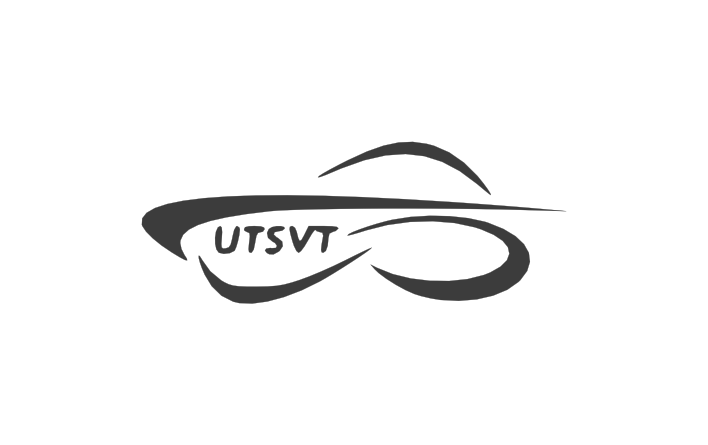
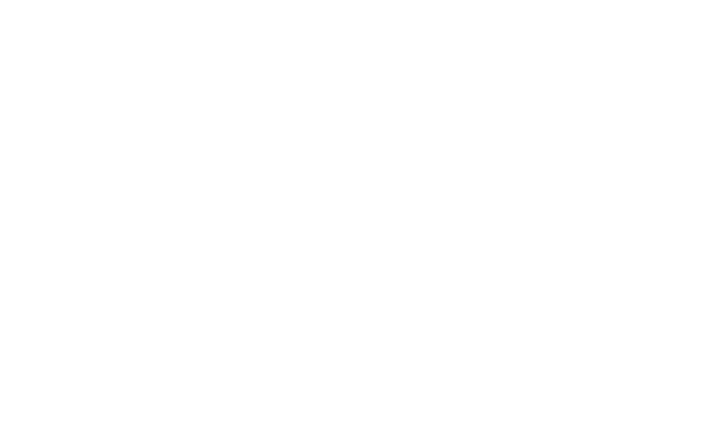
drawing: [141, 141, 567, 304] -> none

